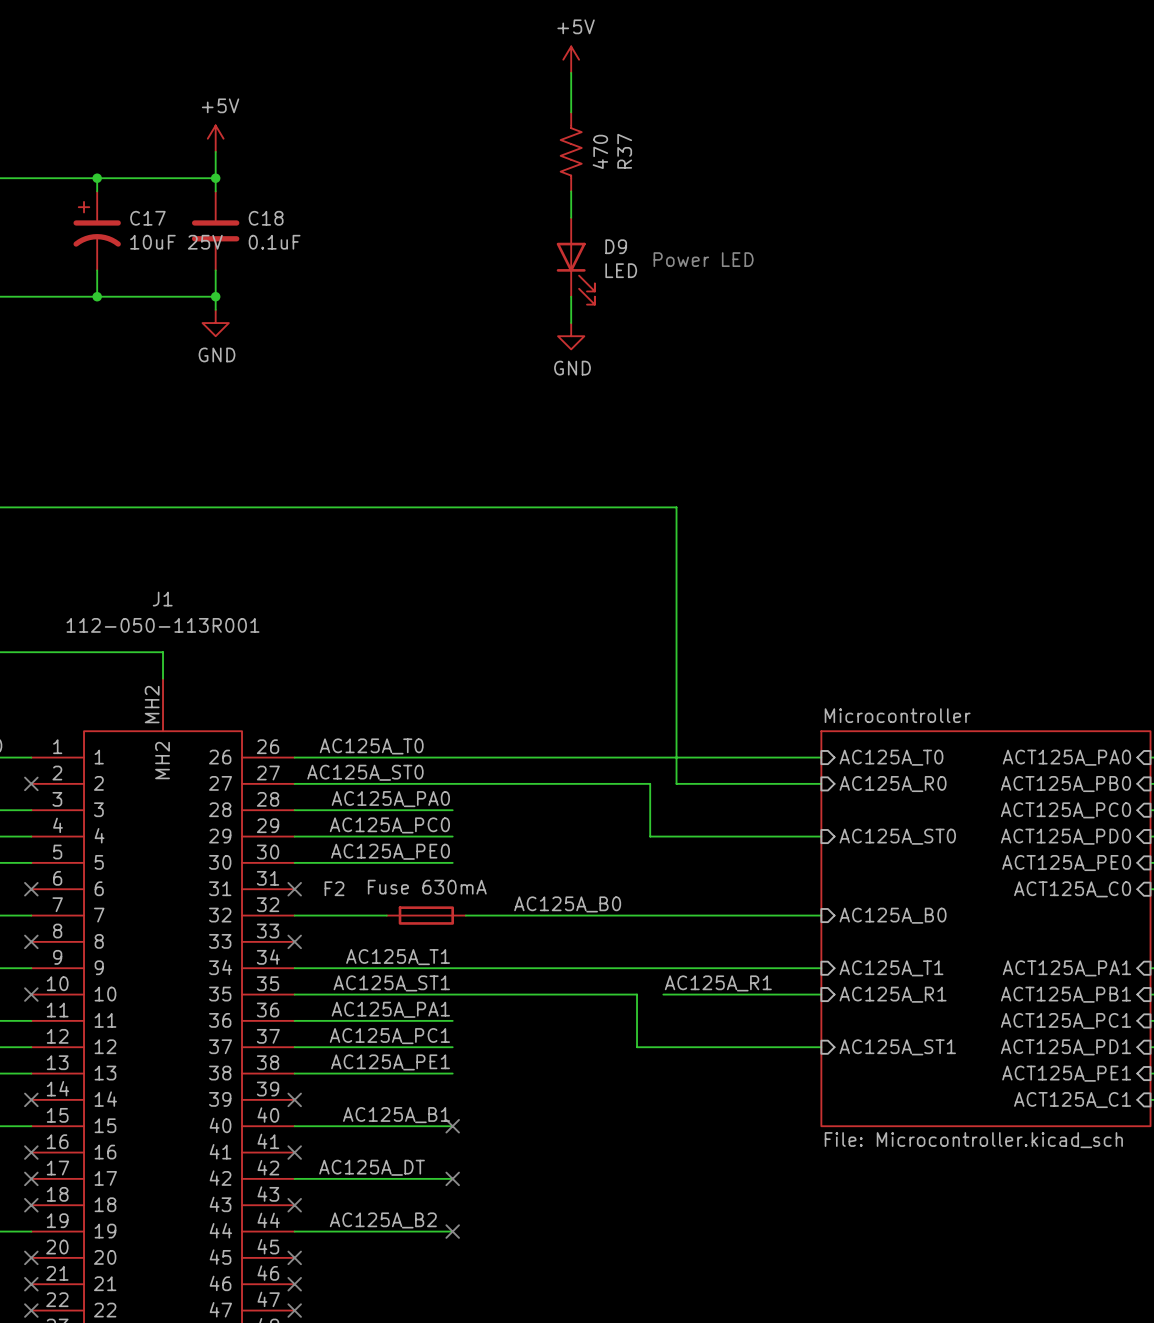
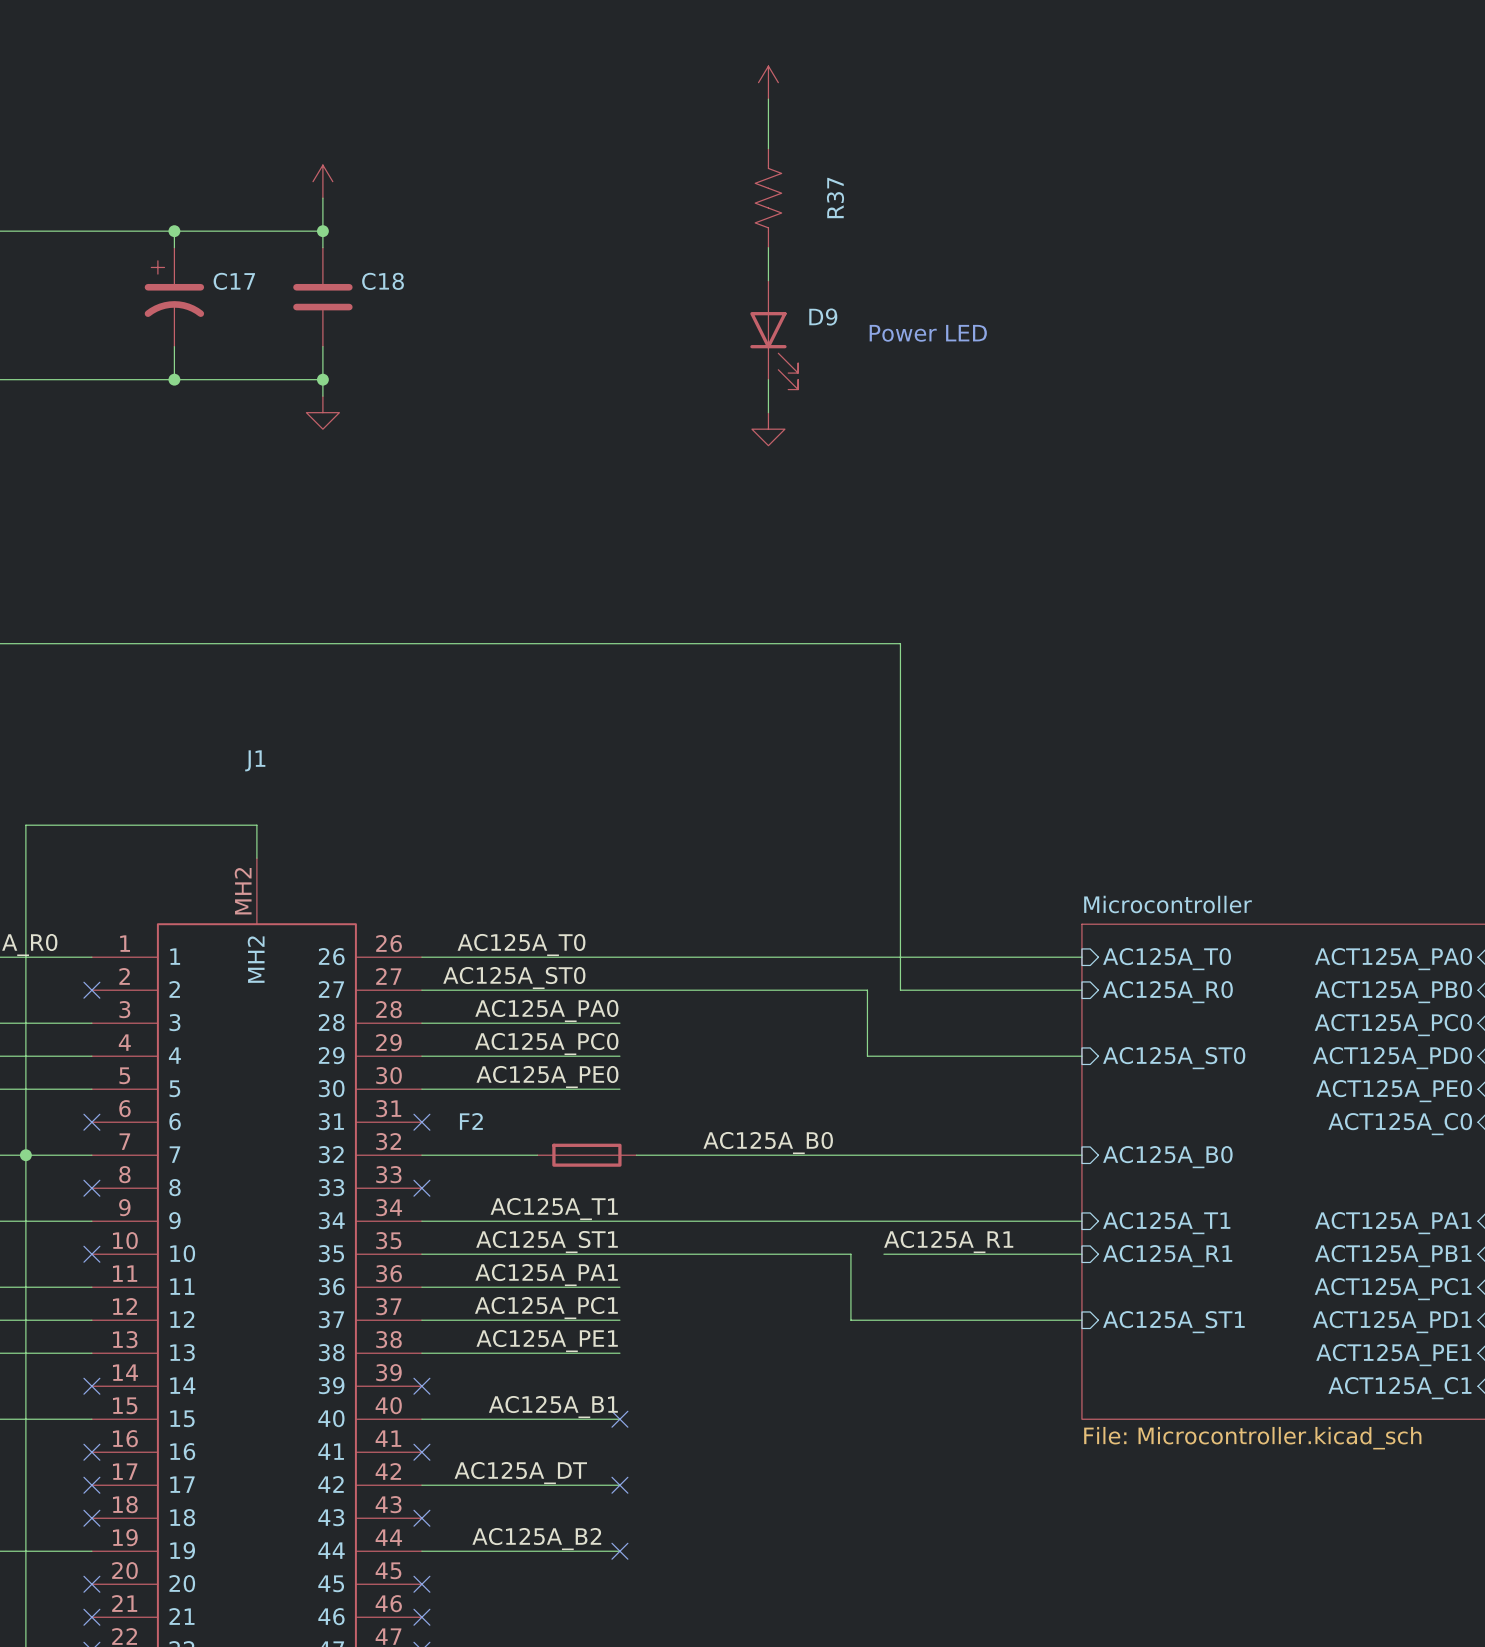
power symbol text: +5V (576, 26) -> none
power symbol text: +5V (220, 105) -> none
R37 value: 470 (600, 151) -> none
C17 value: 10uF 25V (176, 242) -> none
C18 value: 0.1uF (274, 242) -> none
D9 value: LED (621, 270) -> none
power symbol text: GND (217, 354) -> none
power symbol text: GND (572, 368) -> none
J1 value: 112-050-113R001 (163, 625) -> none
F2 value: Fuse 630mA (427, 887) -> none

